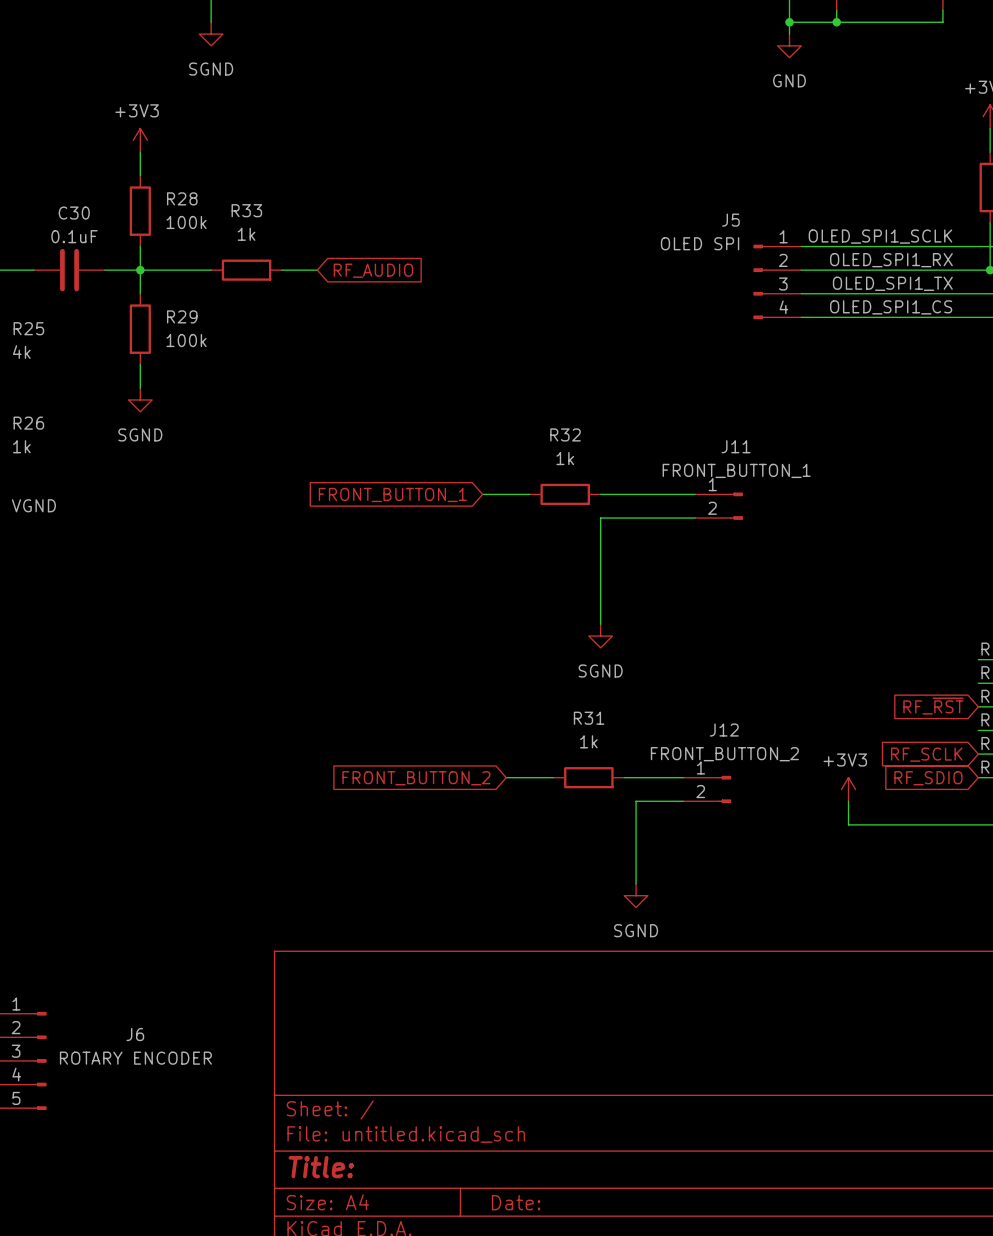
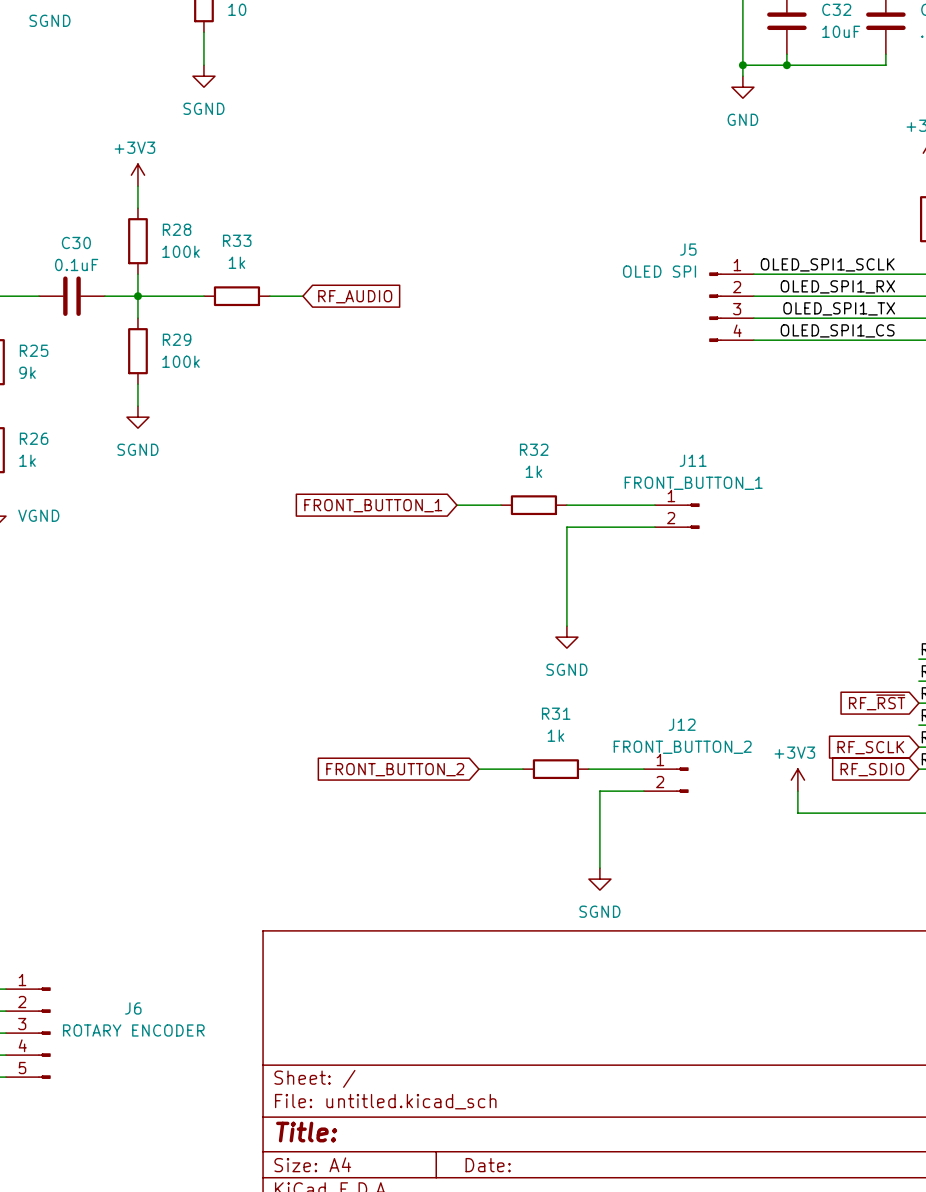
R25 value: 4k (21, 352) -> 9k (27, 372)

